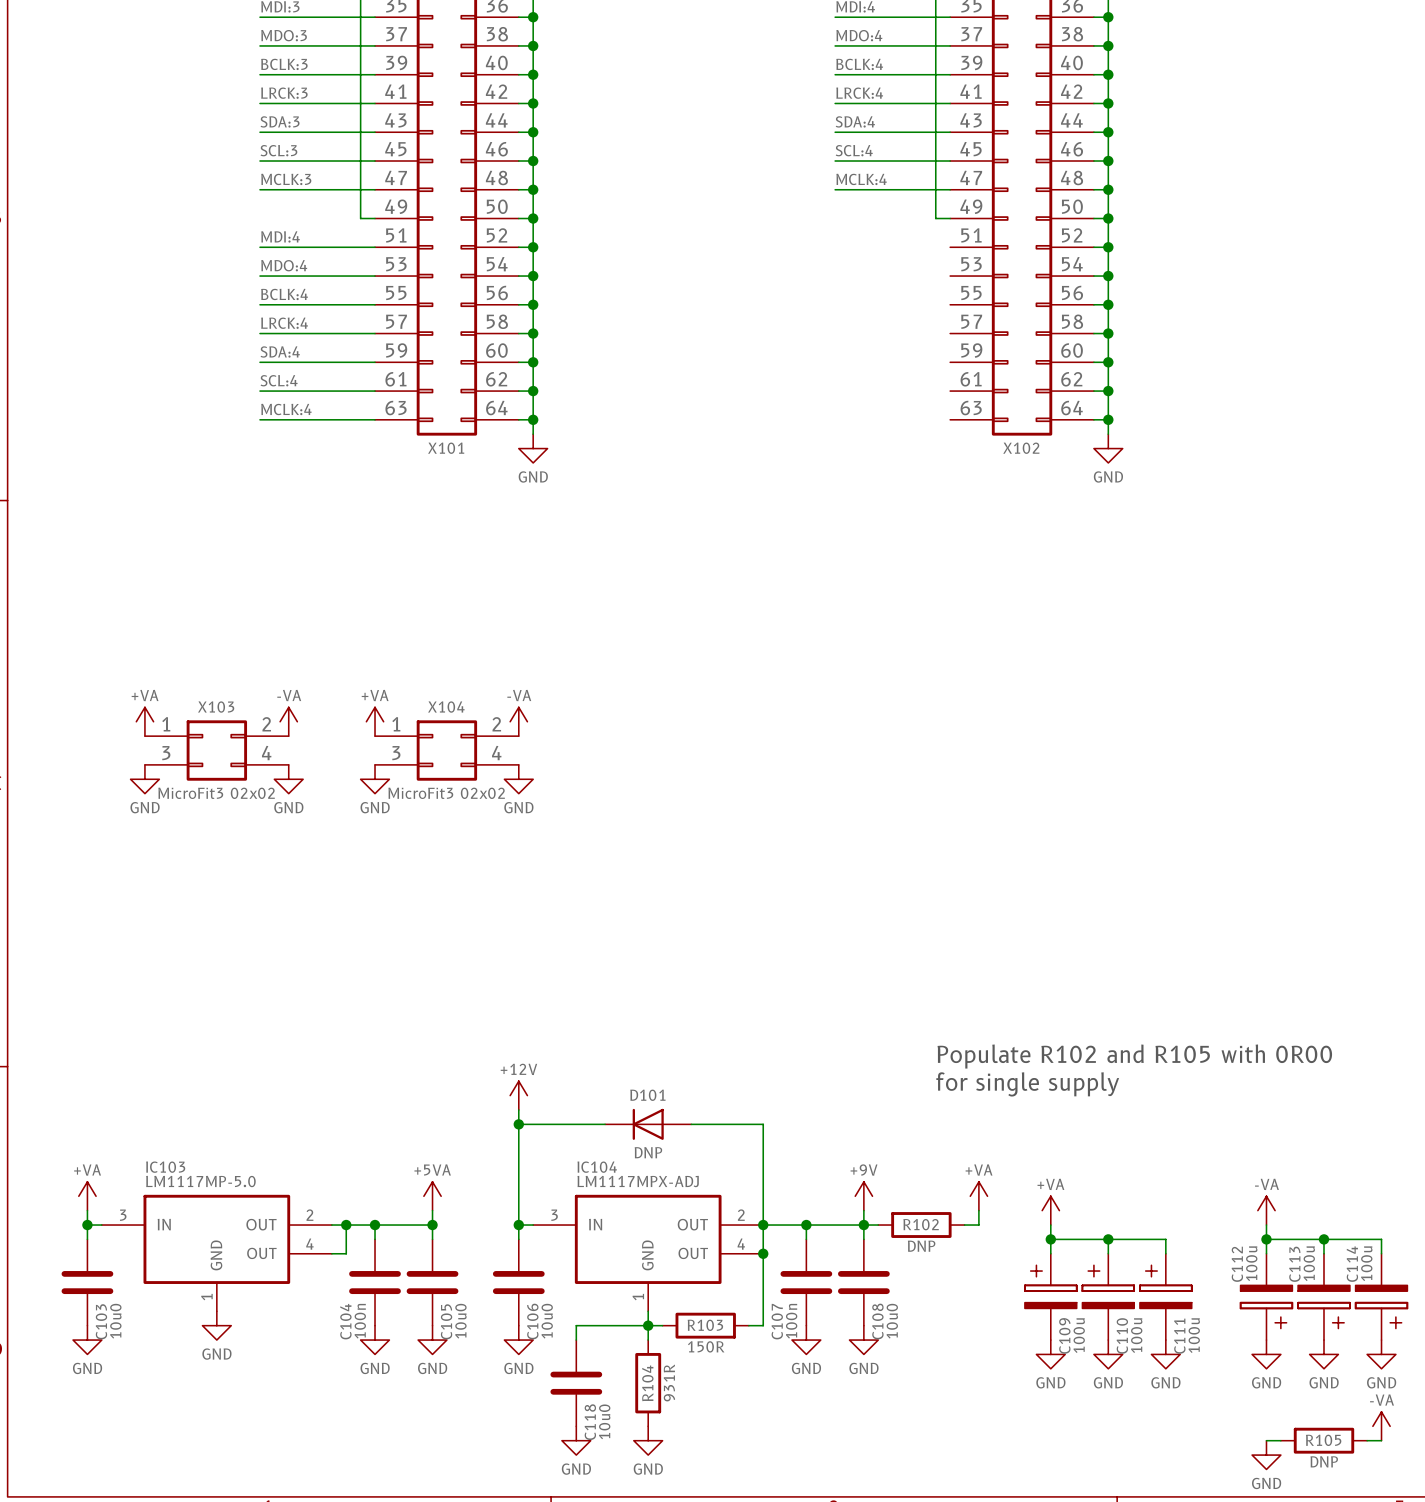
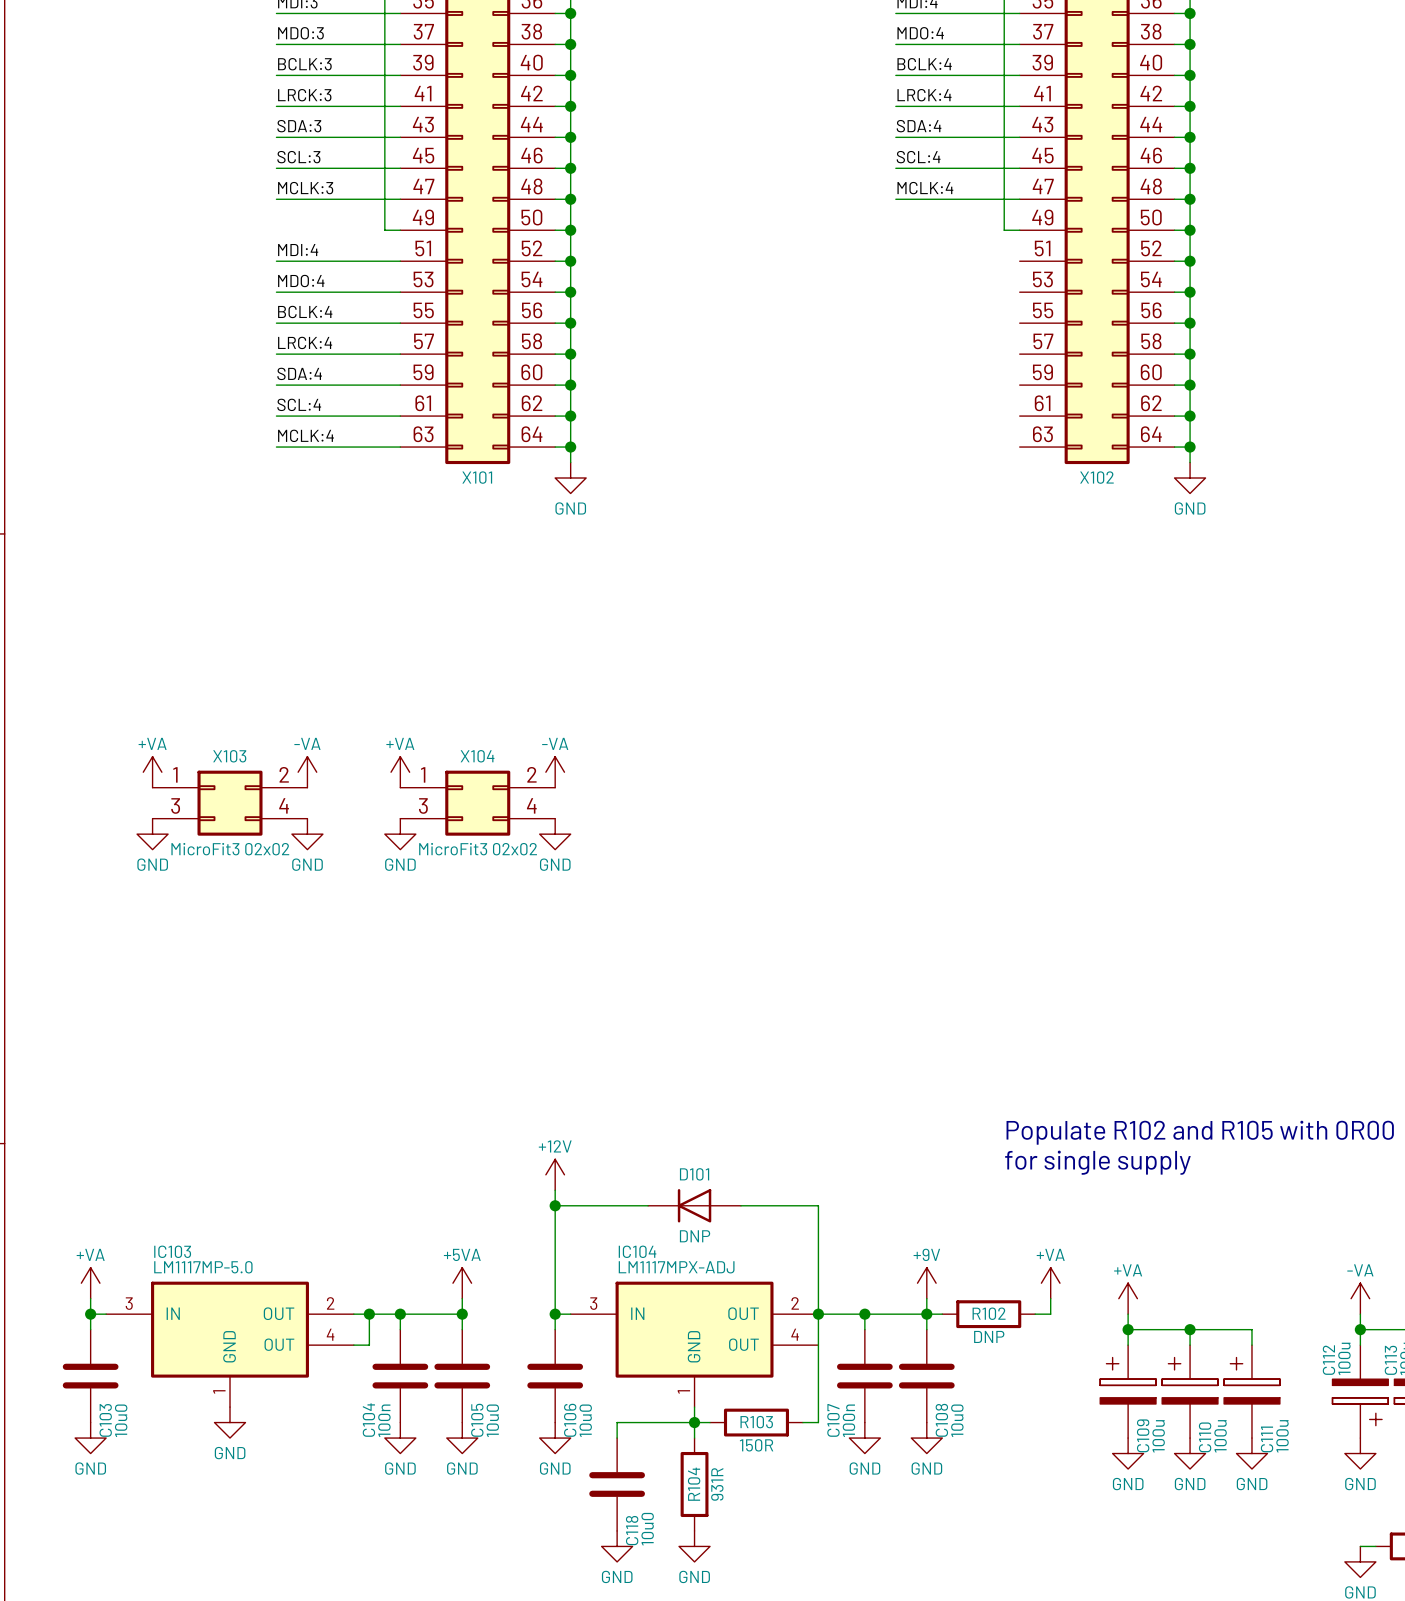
junction: (763, 1253) -> none

